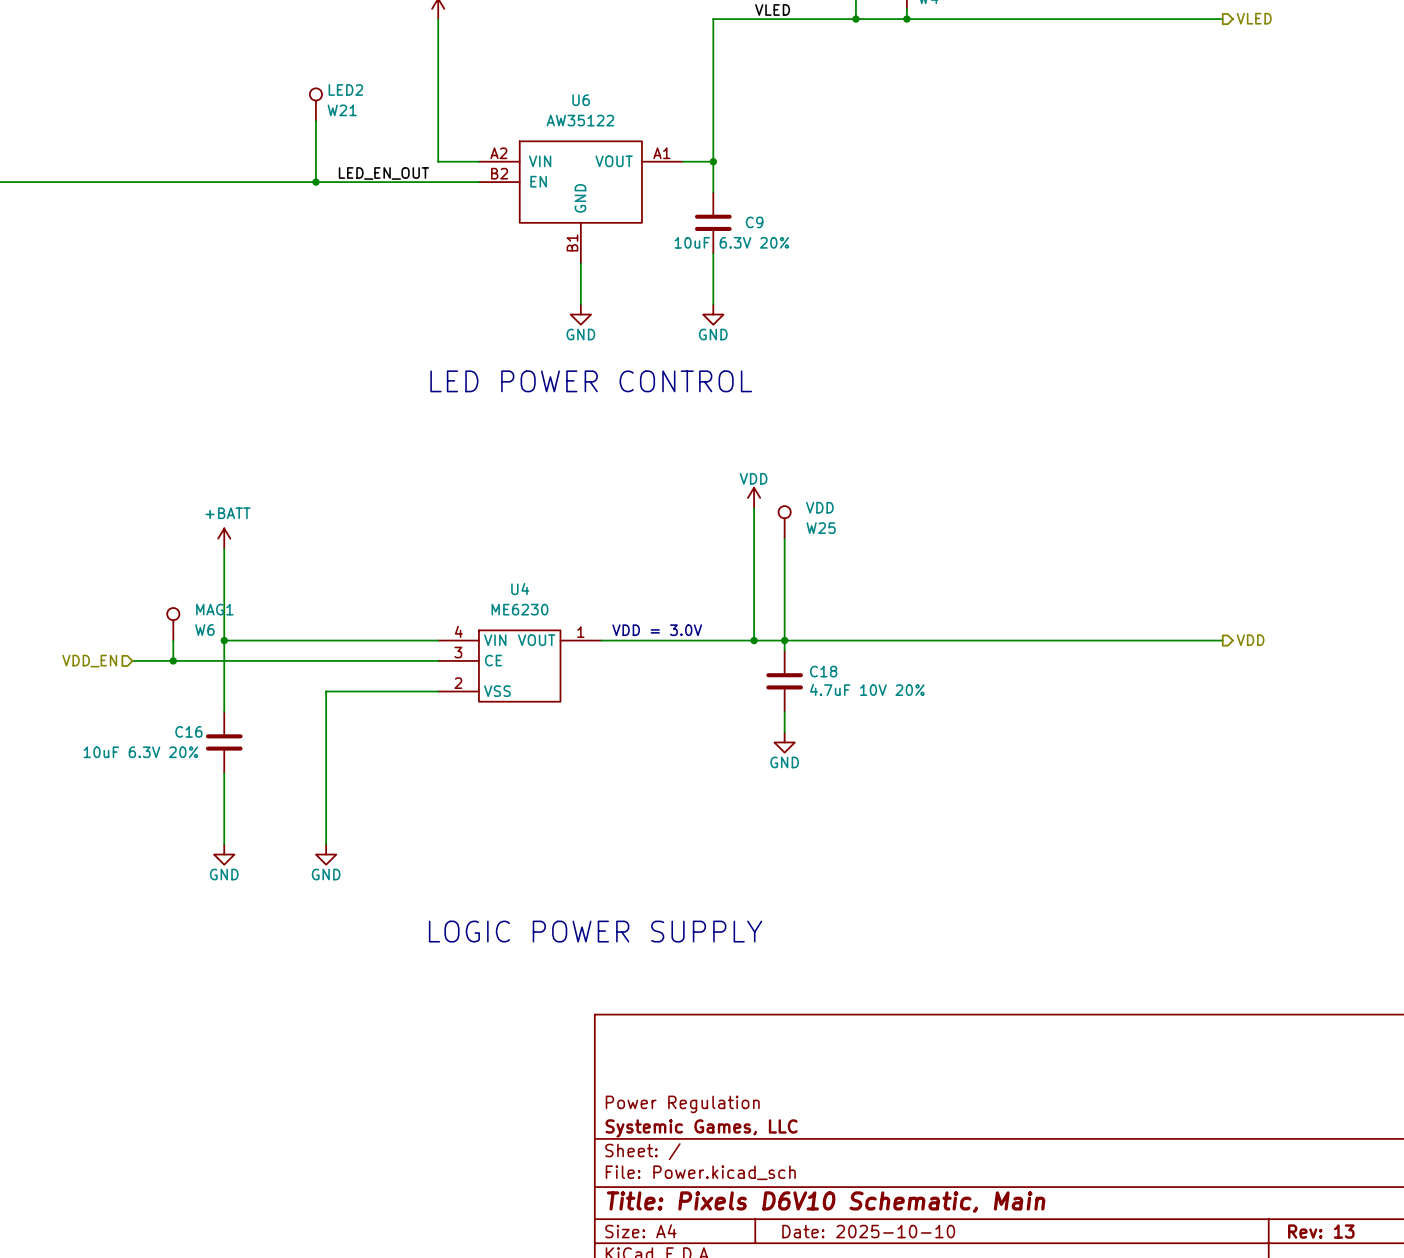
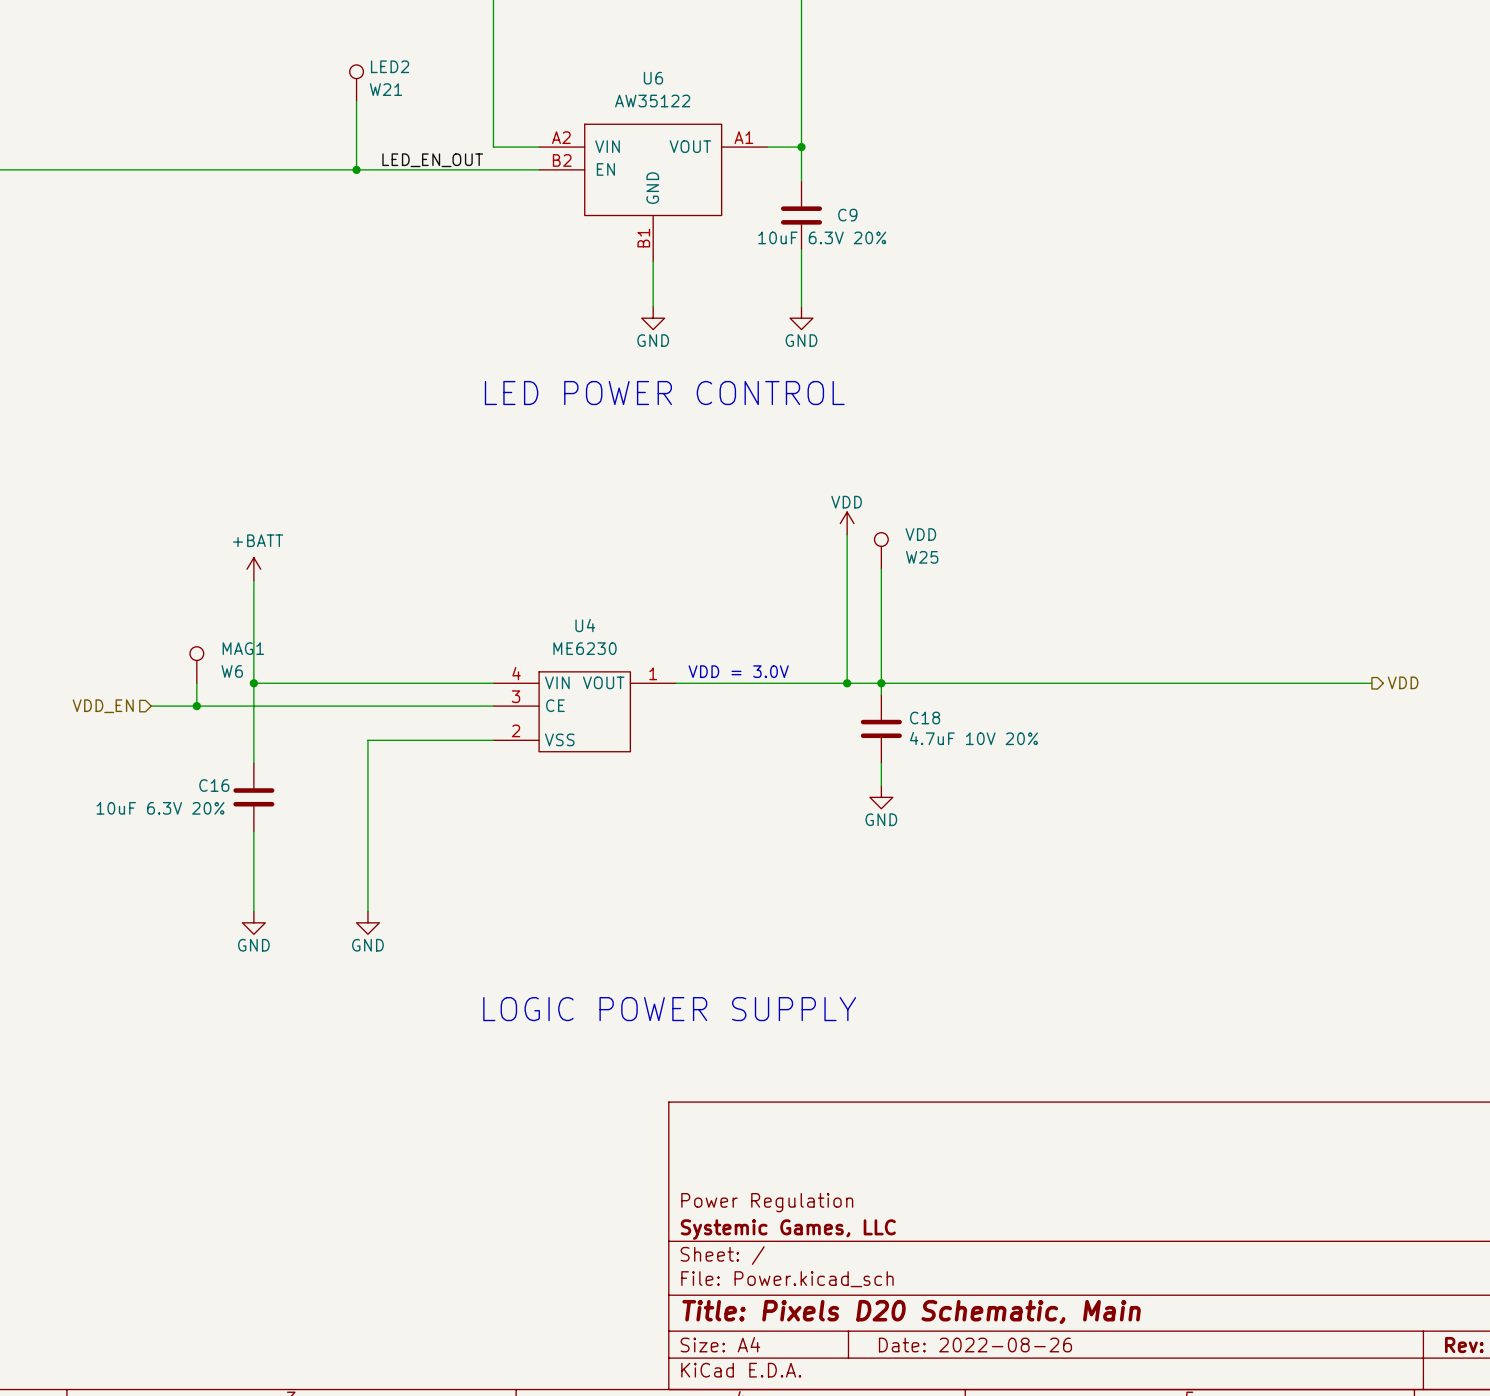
title block: Title: Pixels D6V10 Schematic, Main (826, 1202) -> Title: Pixels D20 Schematic, Main (911, 1312)
title block: Date: 2025-10-10 (868, 1231) -> Date: 2022-08-26 (975, 1345)

